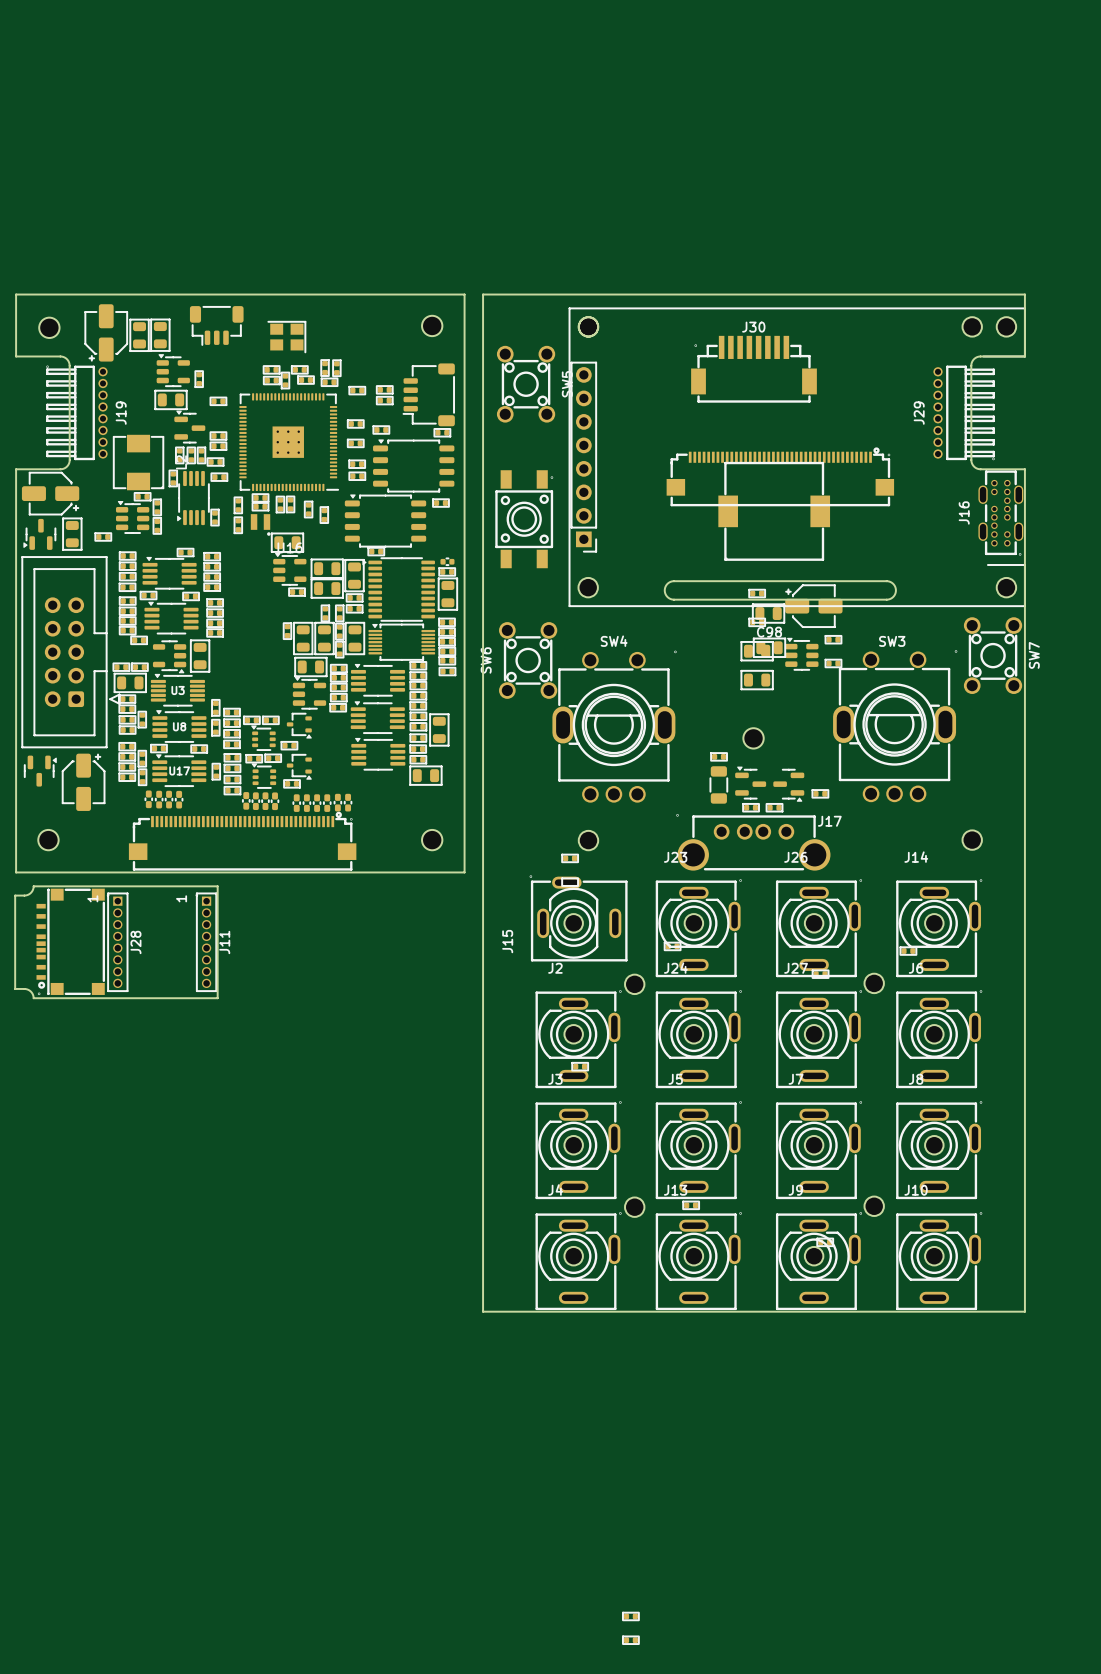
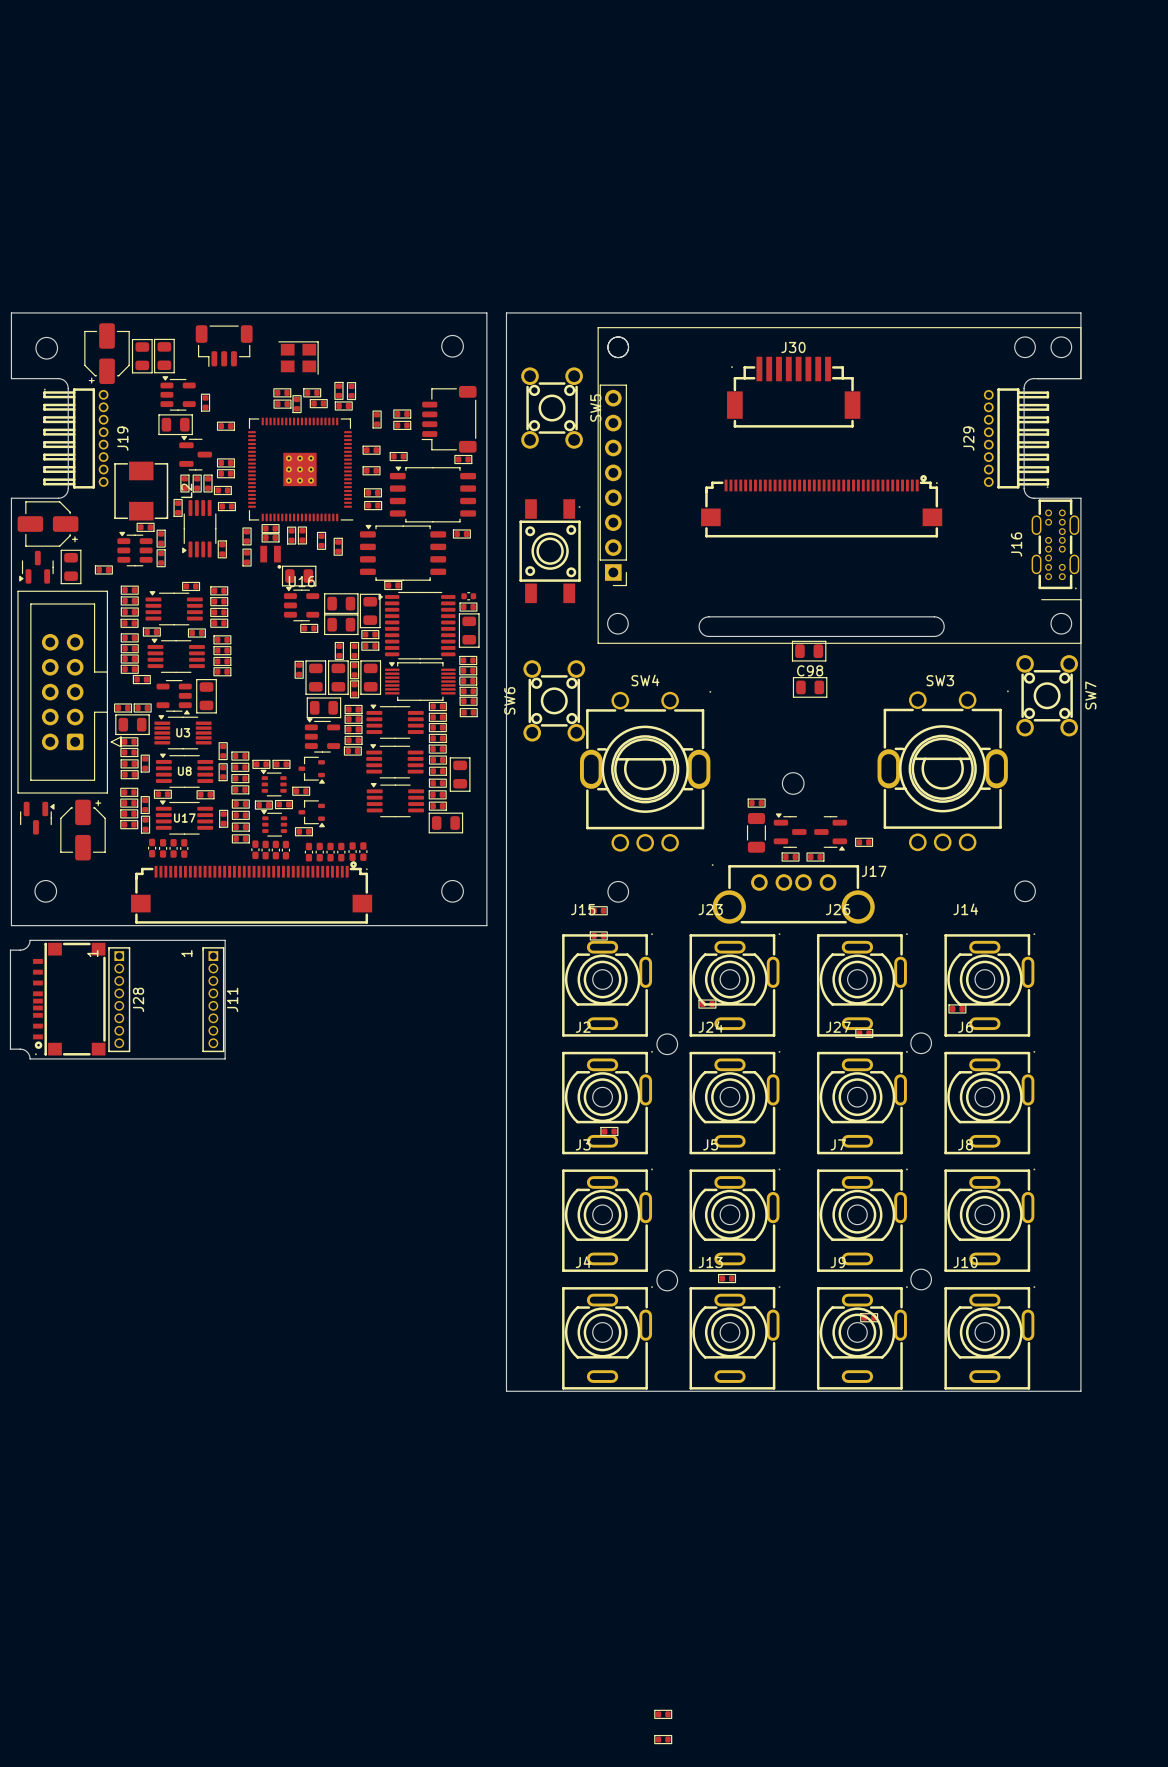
part rotation: 0° (357, 390) -> 90° clockwise (377, 419)
part: (774, 511) -> none
part: (757, 593) -> none
part: (813, 606) -> none
part: (757, 622) -> none
part: (833, 639) -> none
part: (757, 651) -> none
part: (801, 654) -> none
part: (833, 663) -> none
part: (757, 680) -> none
J15 rotation: 0° (578, 918) -> 90° clockwise (607, 985)

